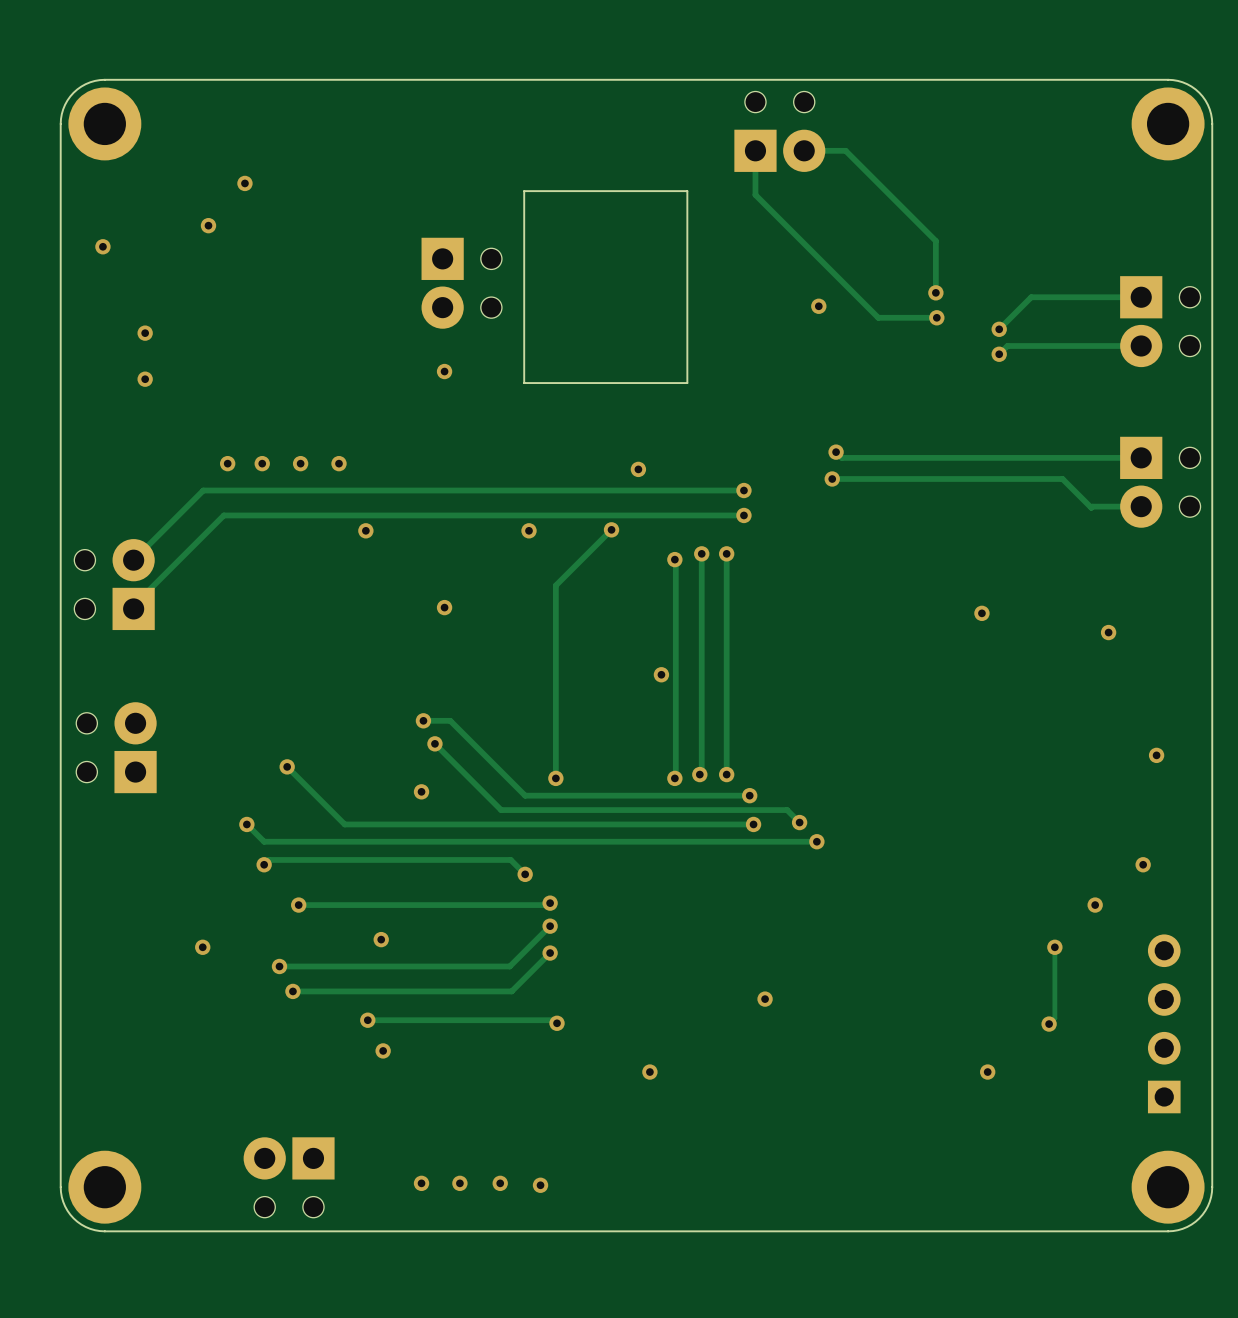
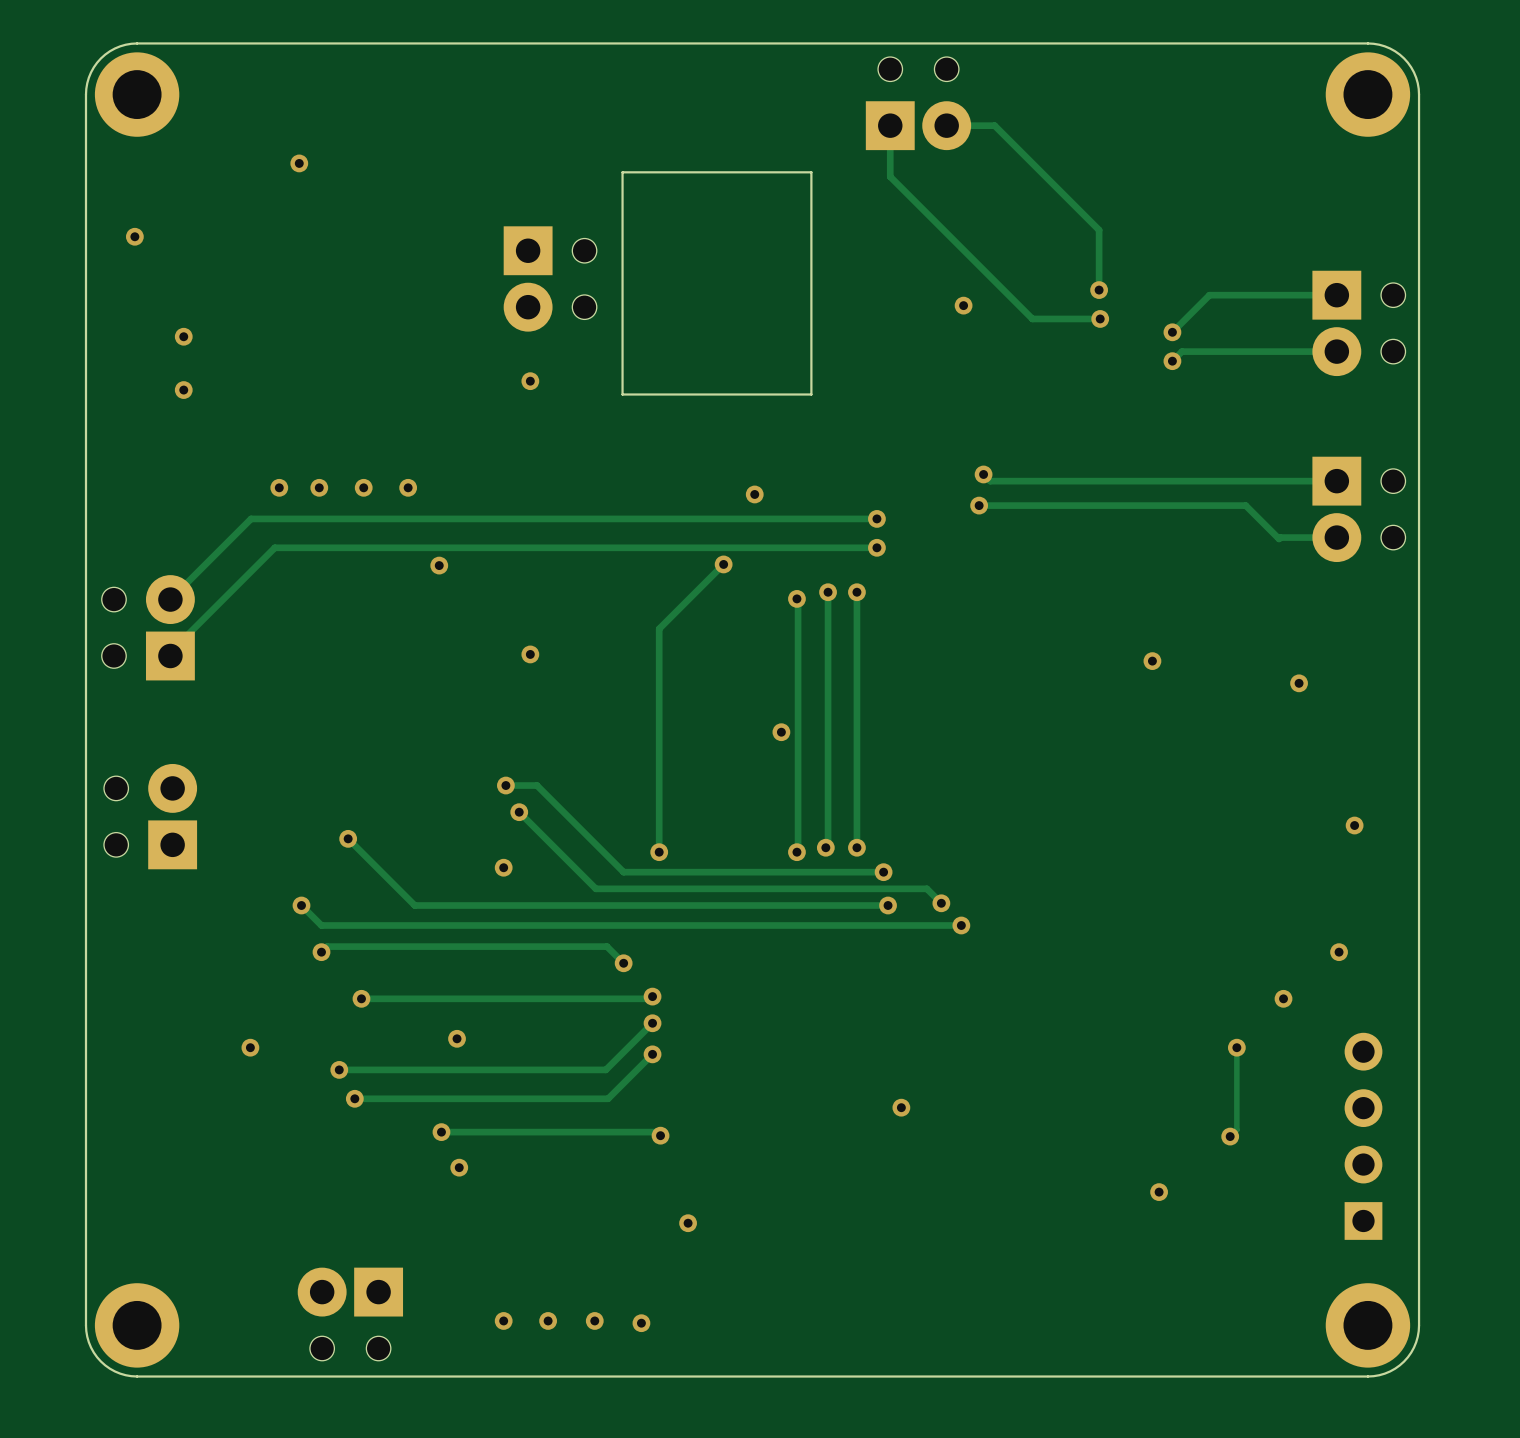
via: (208, 225) -> none
via: (529, 530) -> none
via position: (649, 1072) -> (688, 1223)

